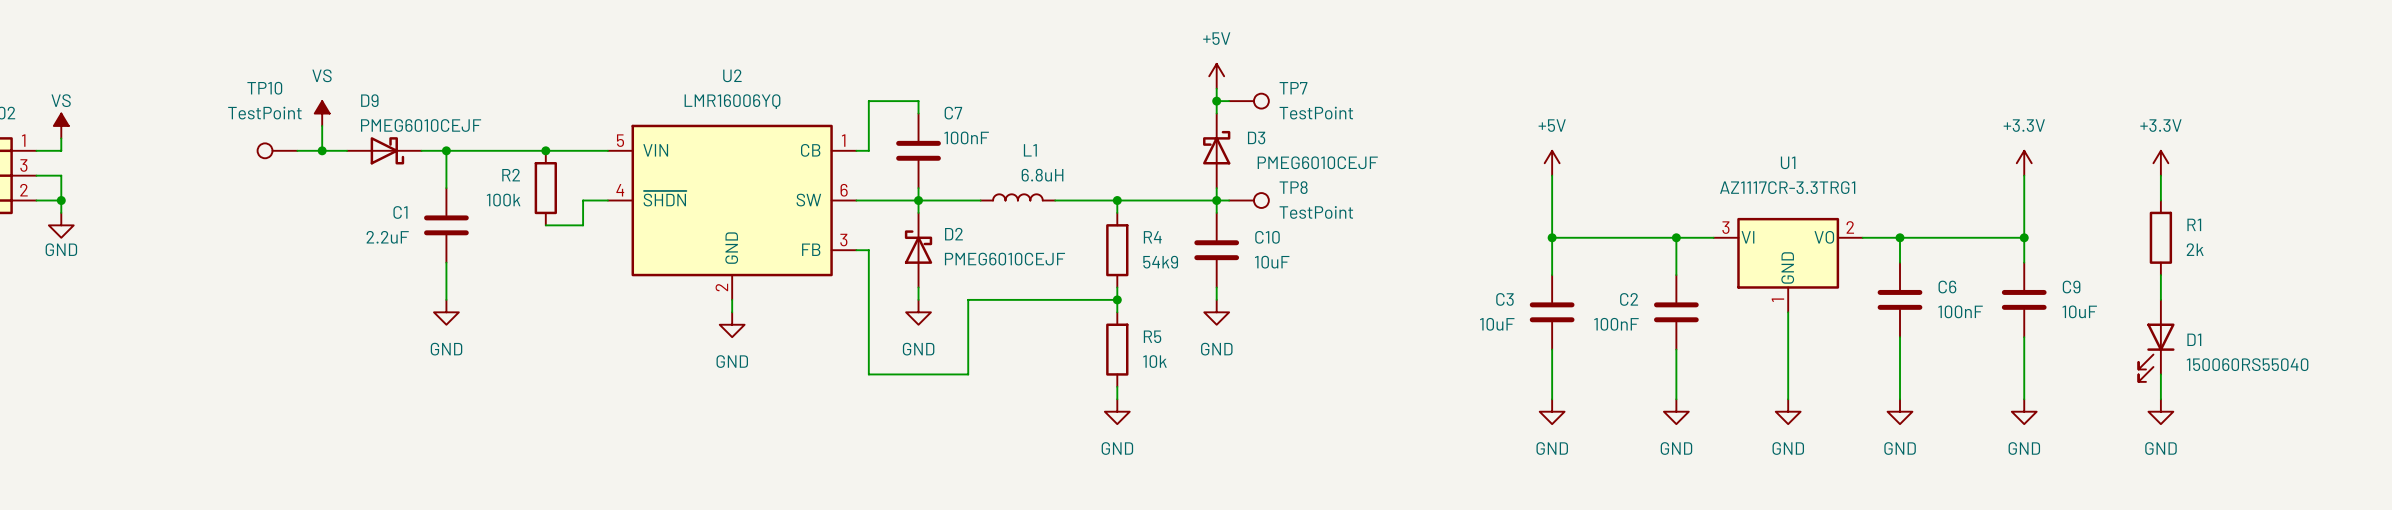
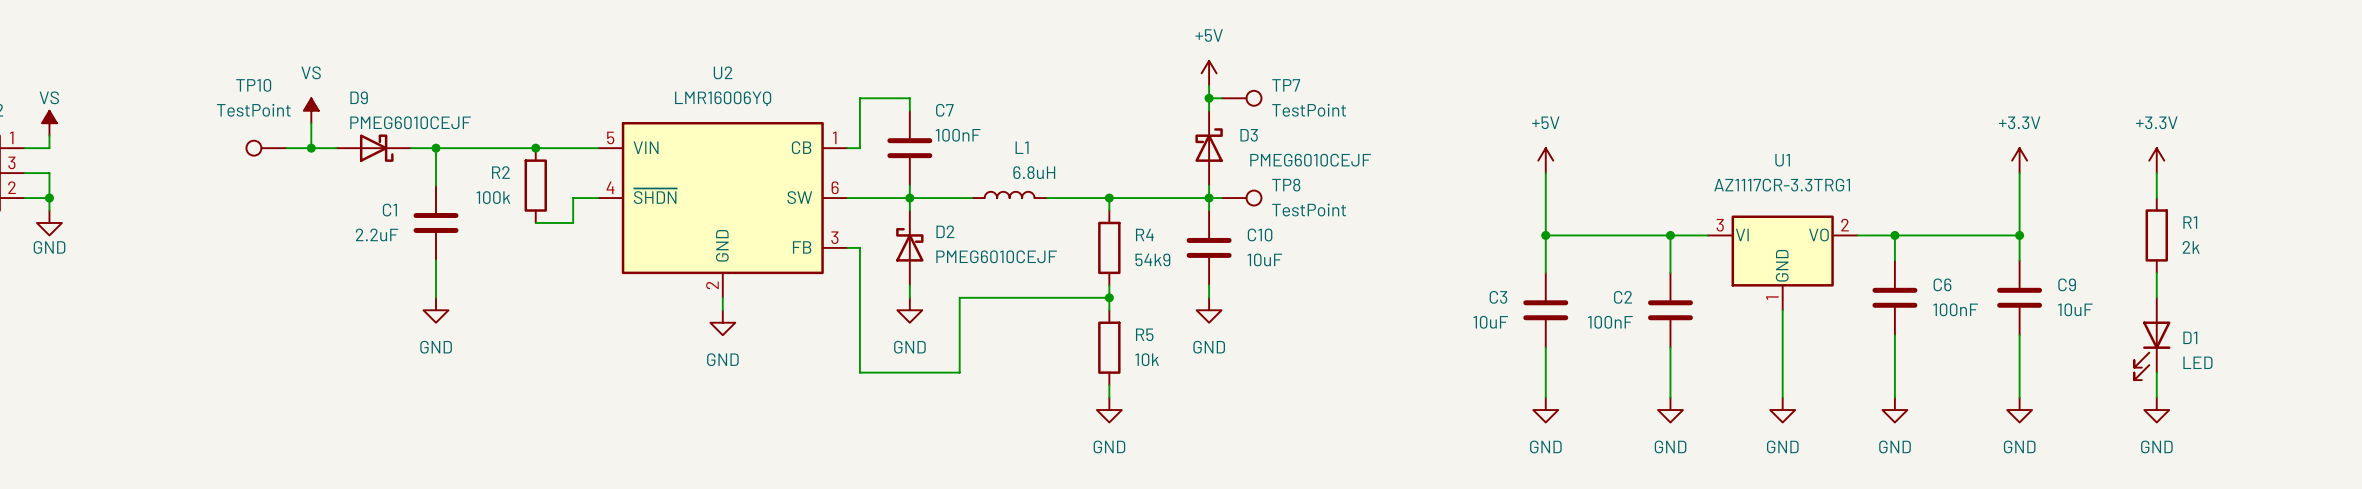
D1 value: 150060RS55040 (2247, 364) -> LED (2197, 362)

